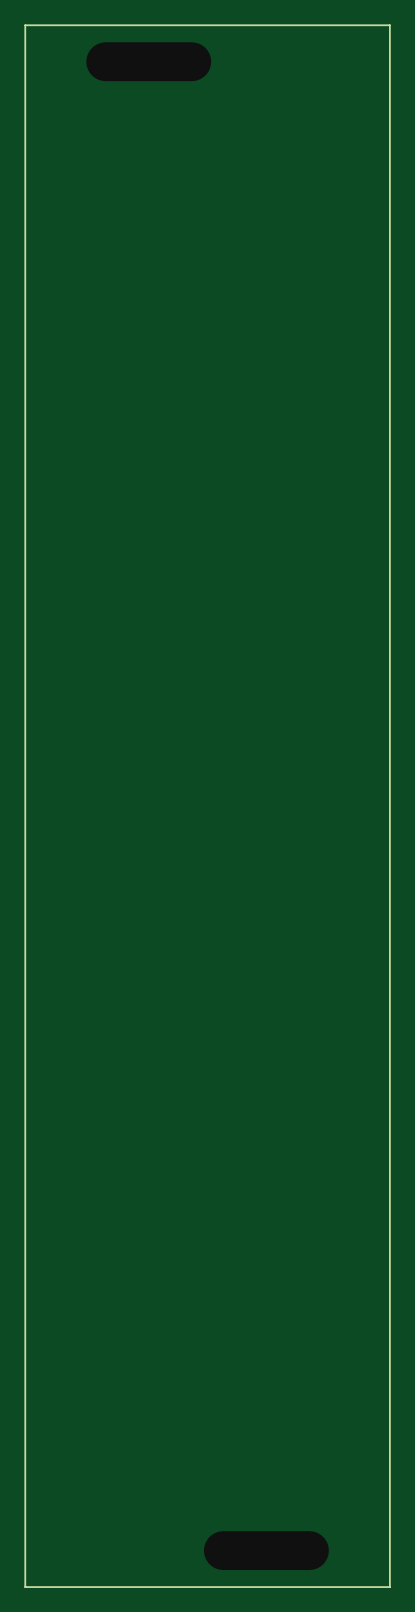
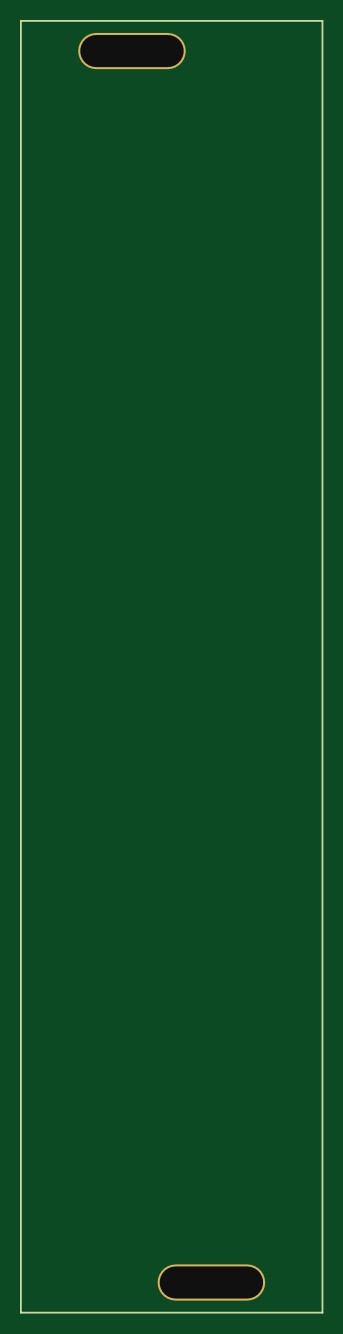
part footprint: [86, 42, 212, 82] -> [78, 32, 186, 70]
part footprint: [203, 1531, 329, 1571] -> [157, 1264, 266, 1301]

